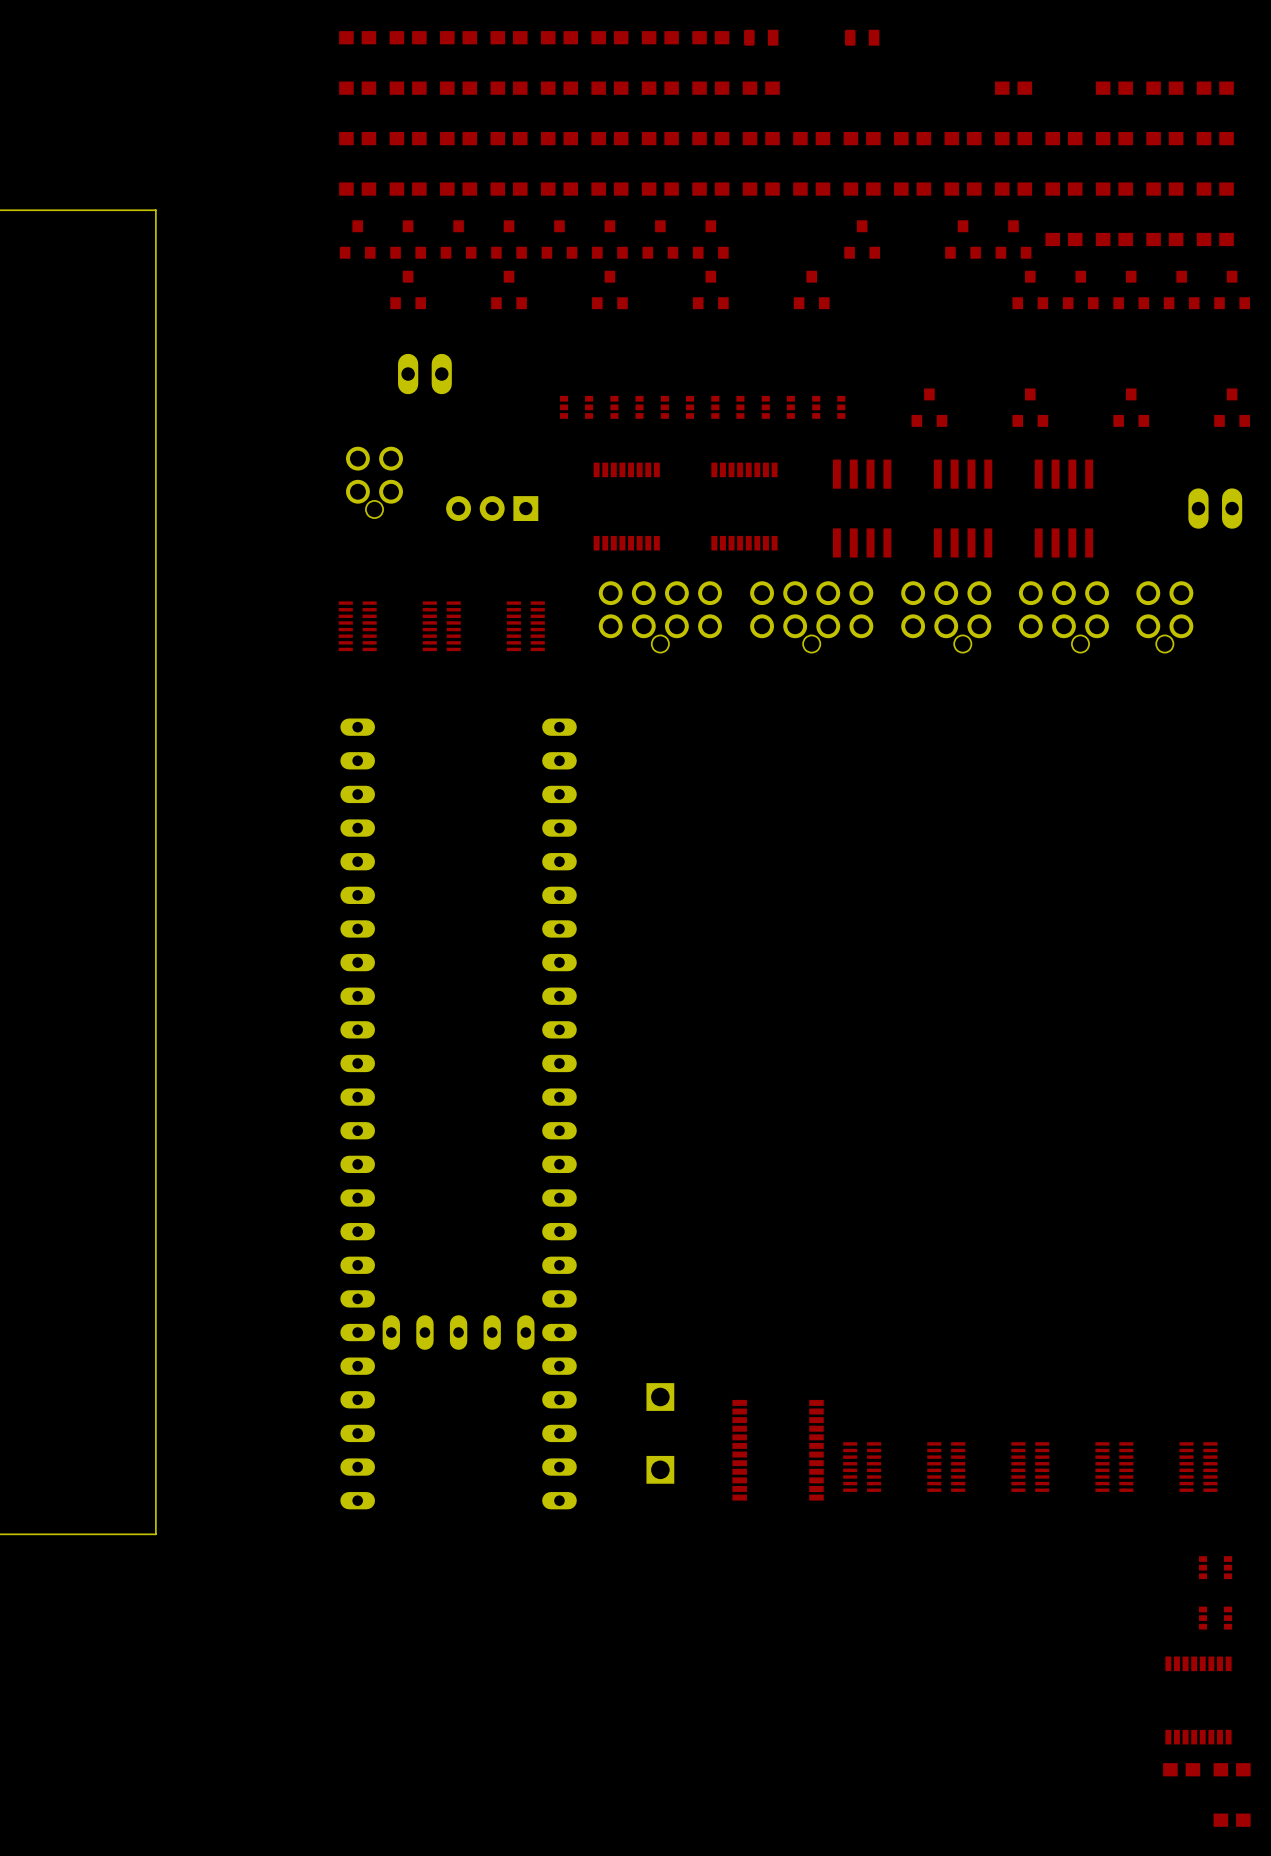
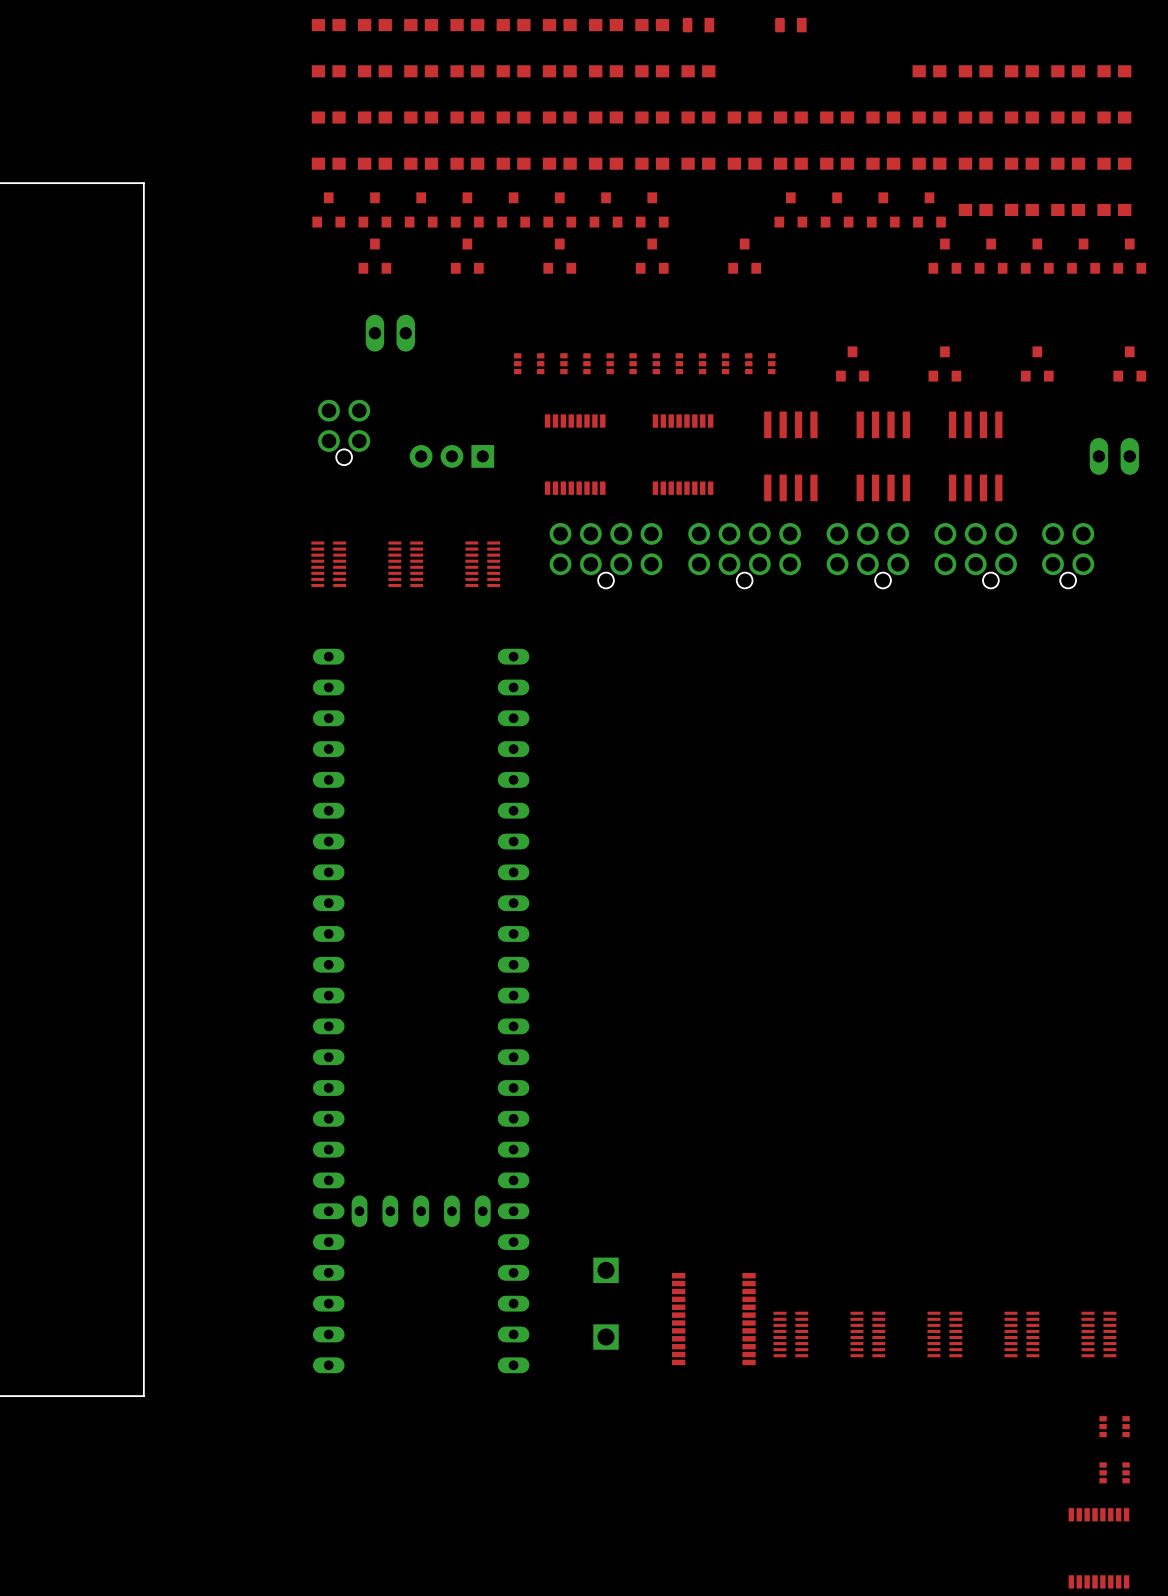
part: none -> (975, 71)
part: none -> (837, 209)

